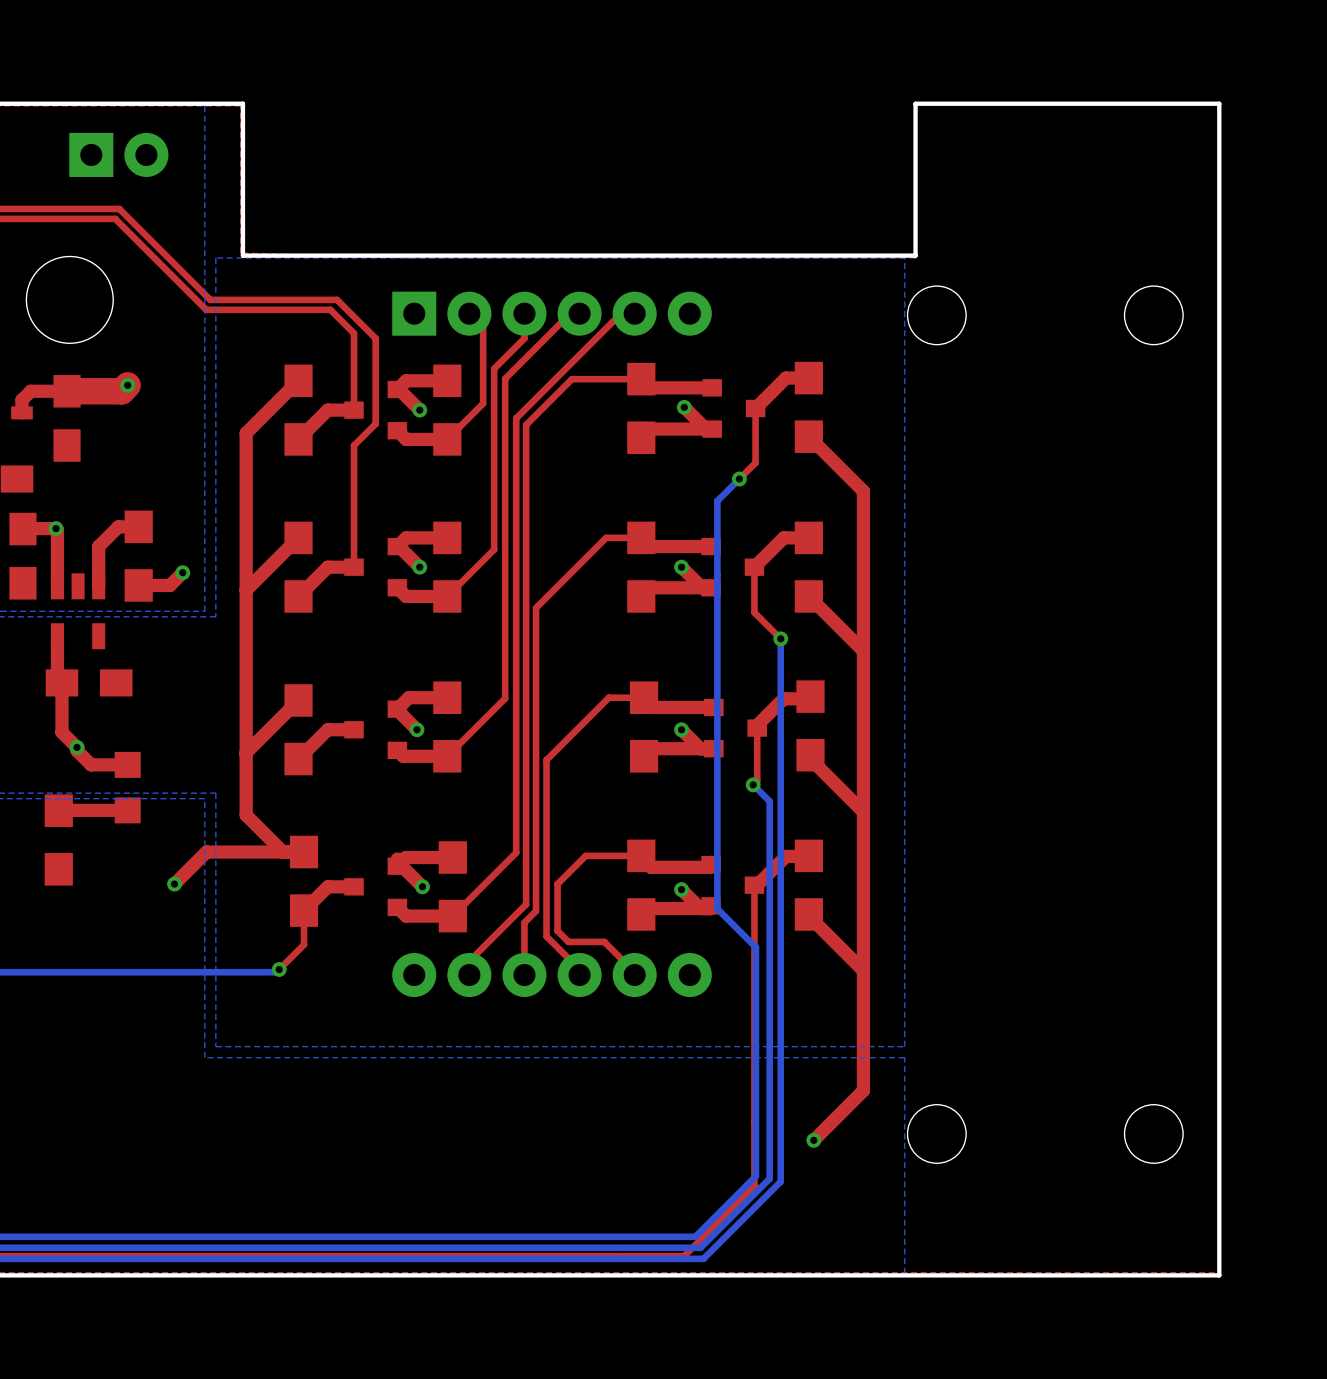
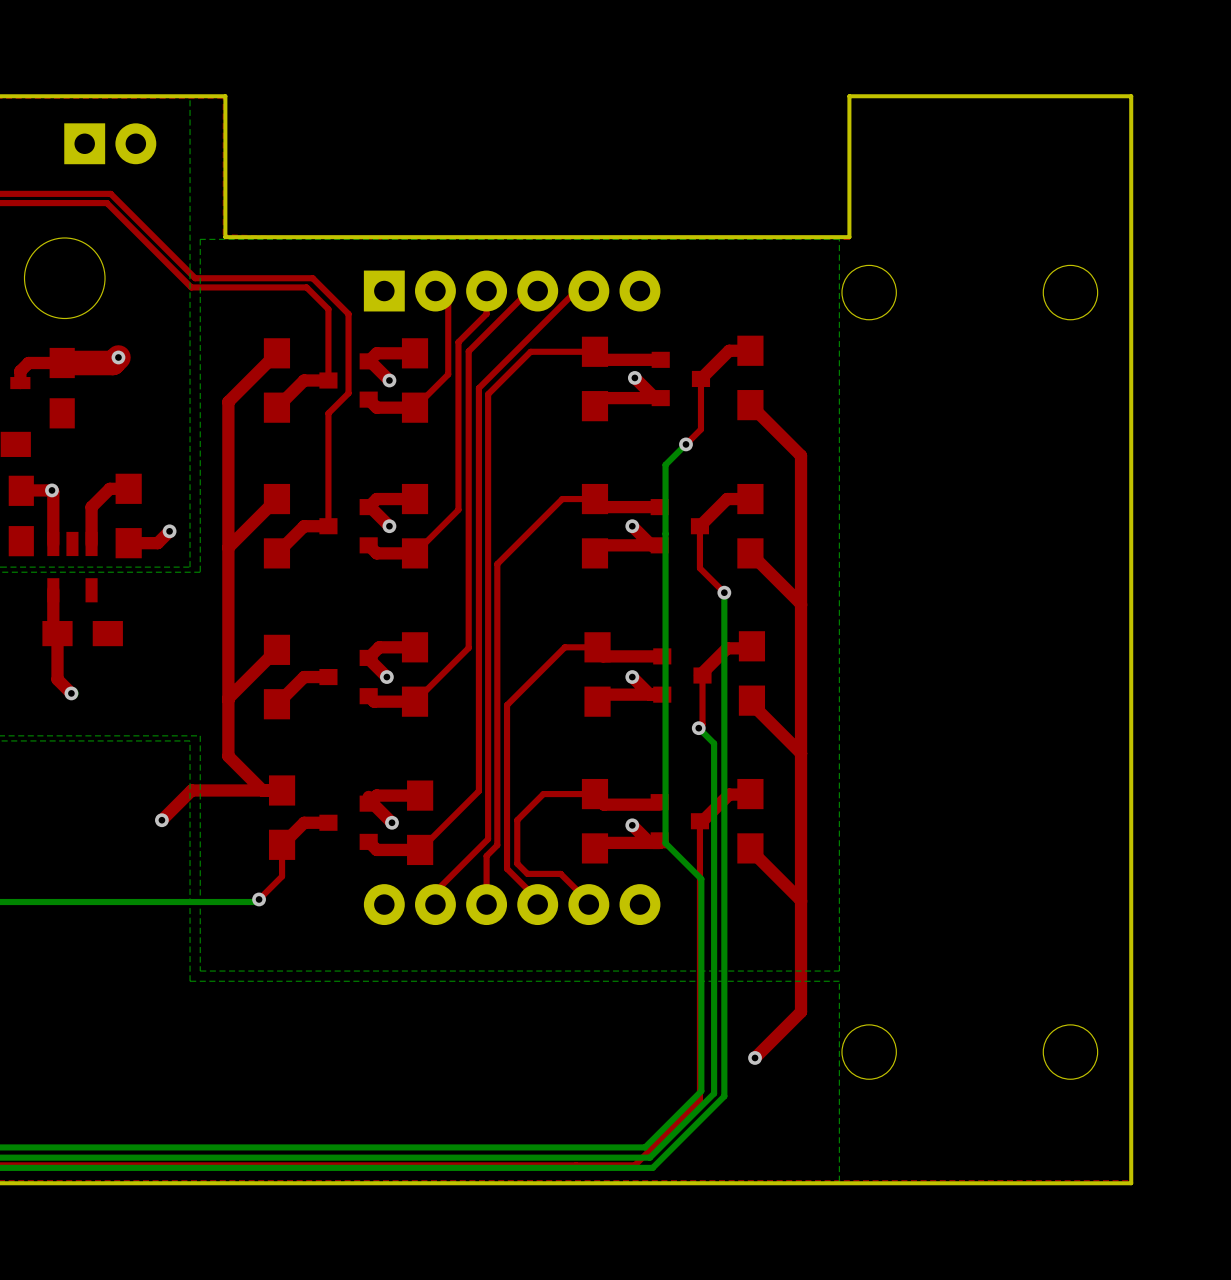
top track: (76, 747) (76, 750) (91, 764) (127, 764) -> none
part: (127, 787) -> none
top track: (127, 810) (59, 810) -> none
part: (58, 839) -> none

